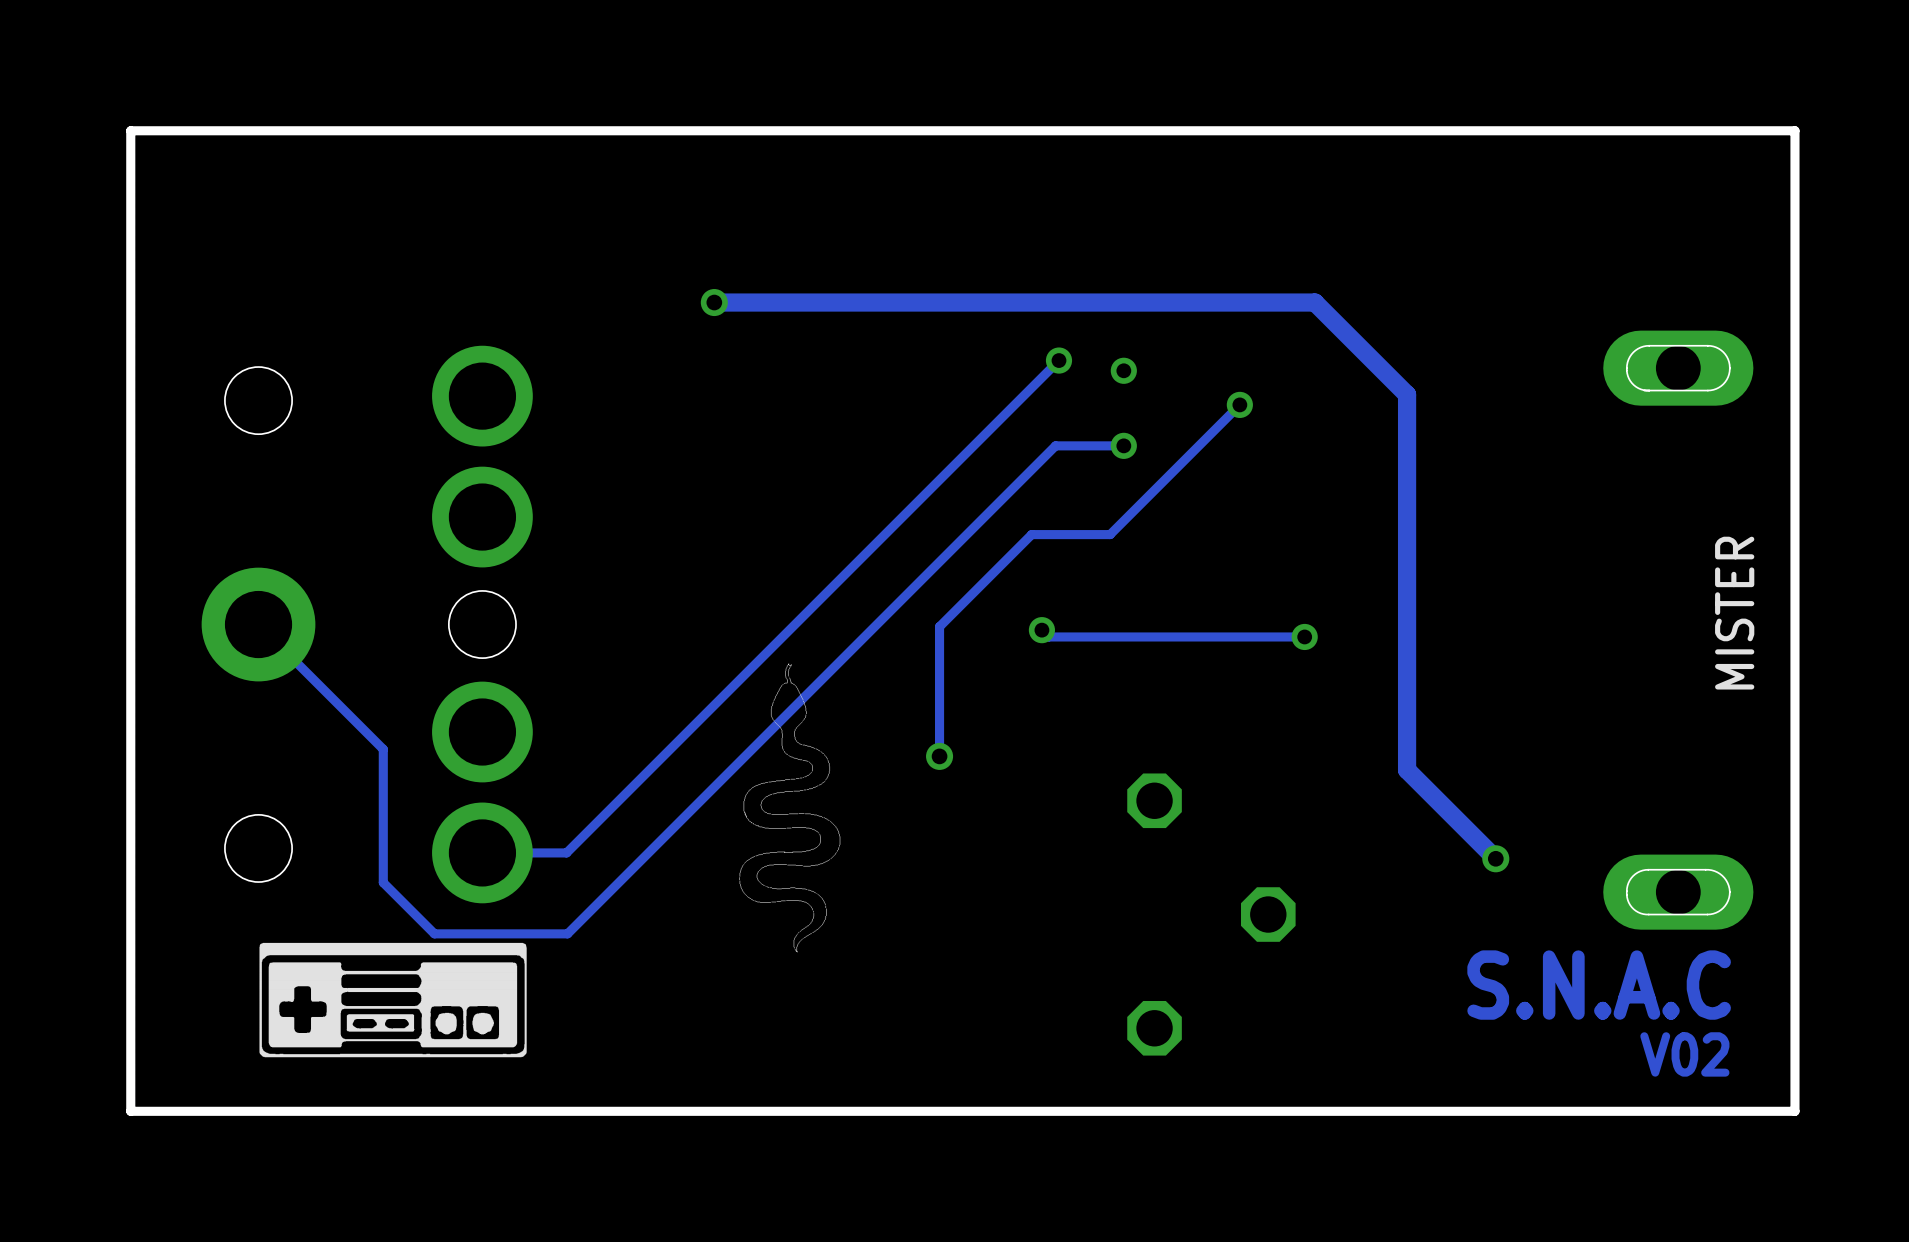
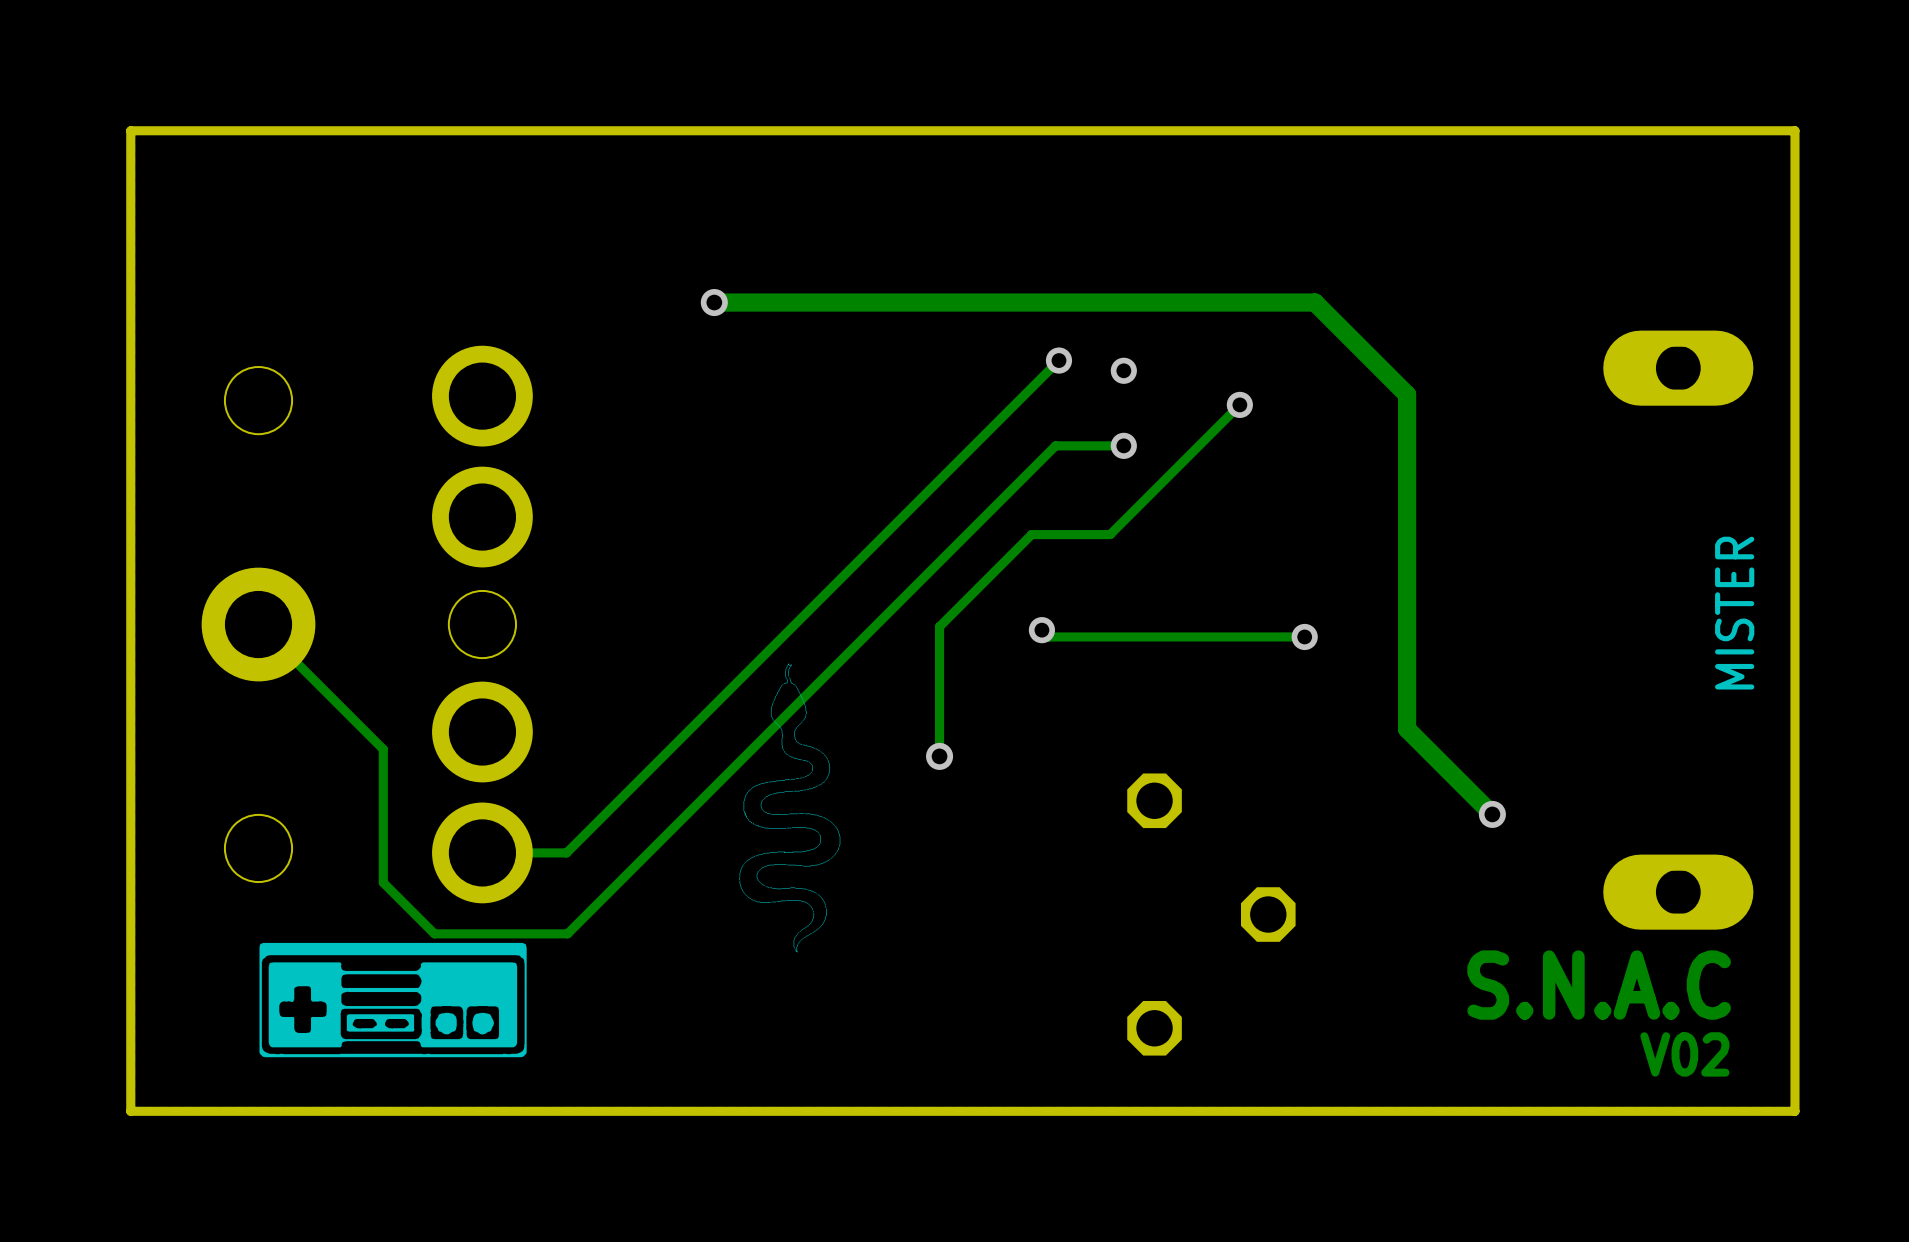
track: (1407, 729) (1407, 770) (1495, 858) -> (1407, 729) (1492, 814)
via position: (1495, 858) -> (1492, 814)

